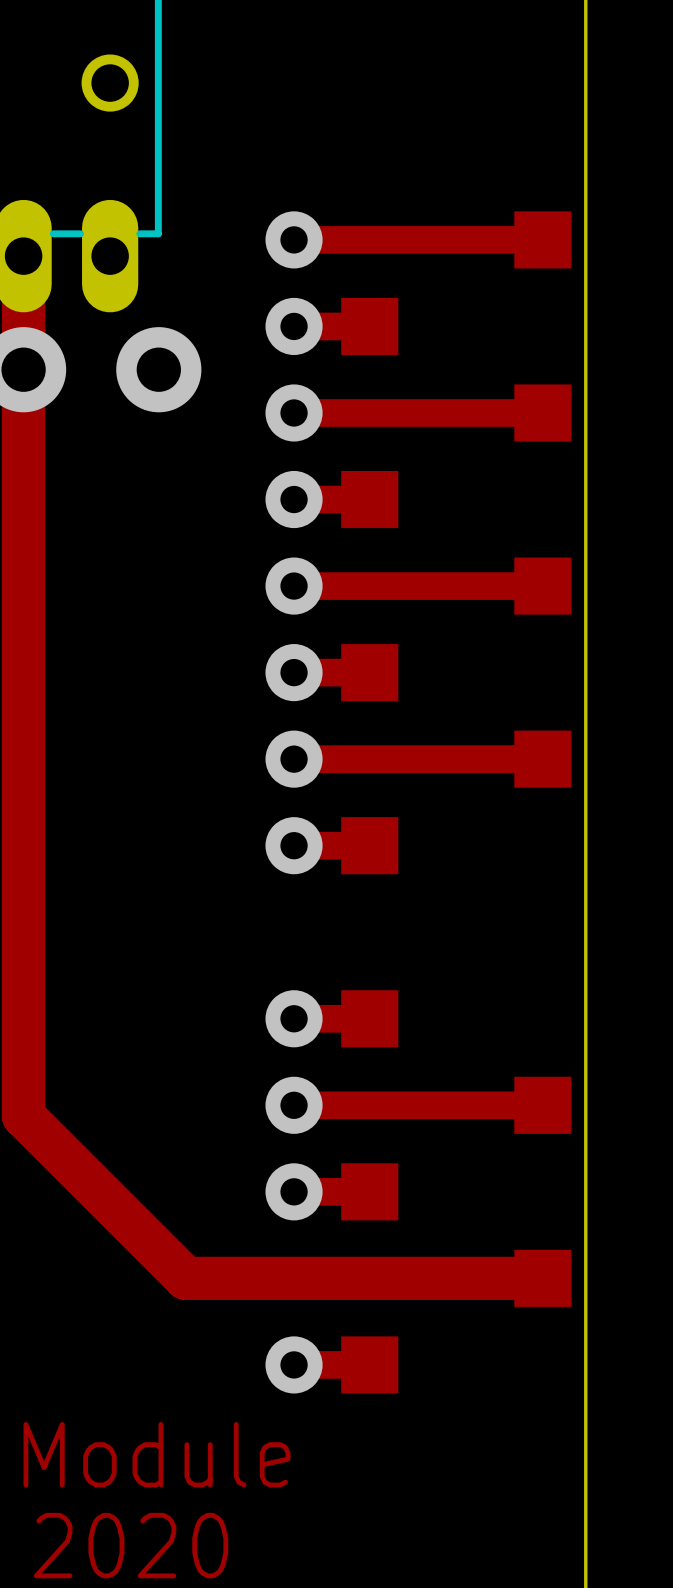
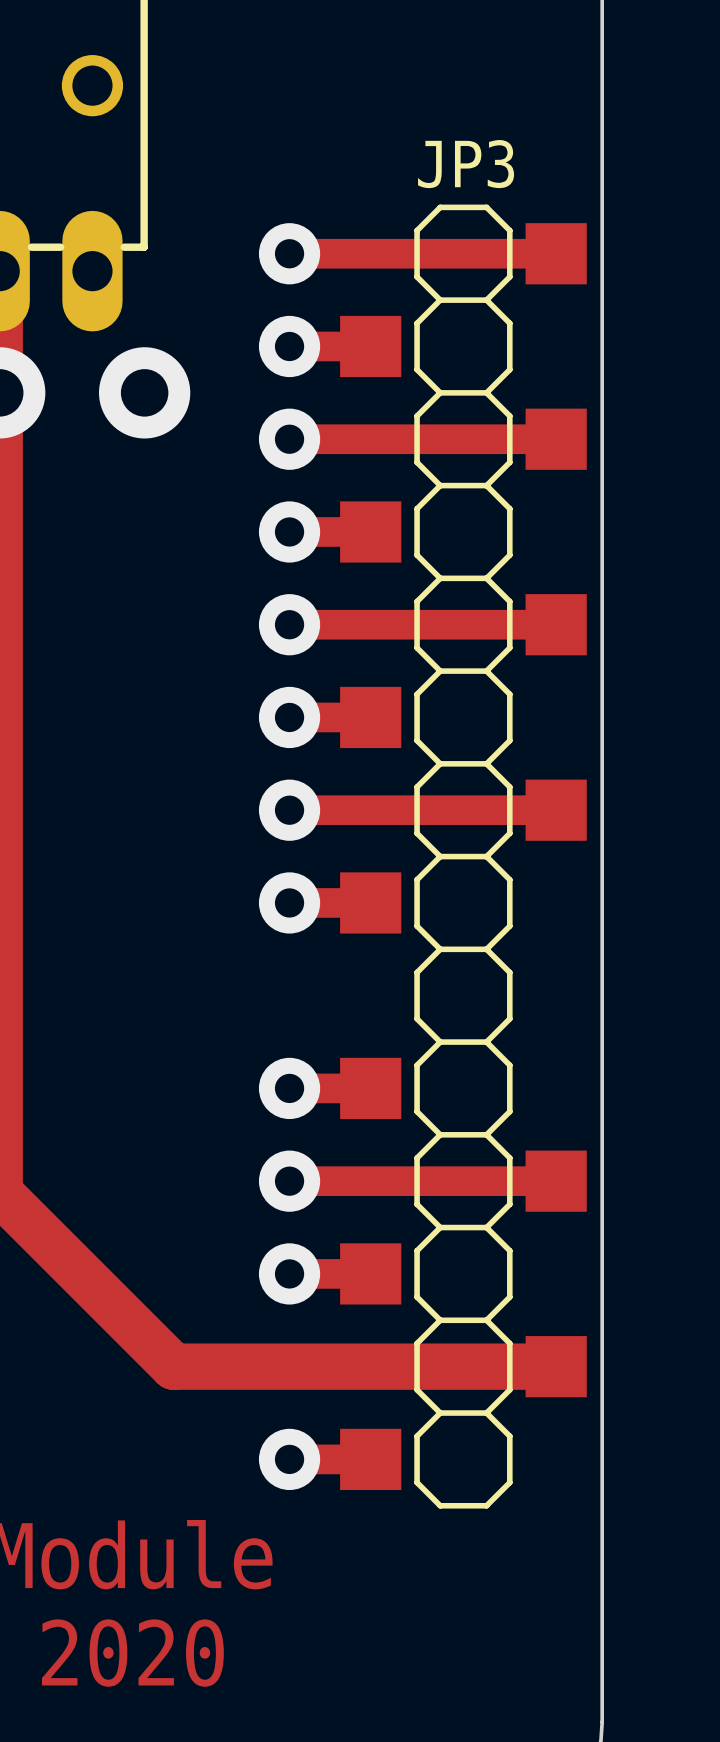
JP3: none -> (463, 856)

